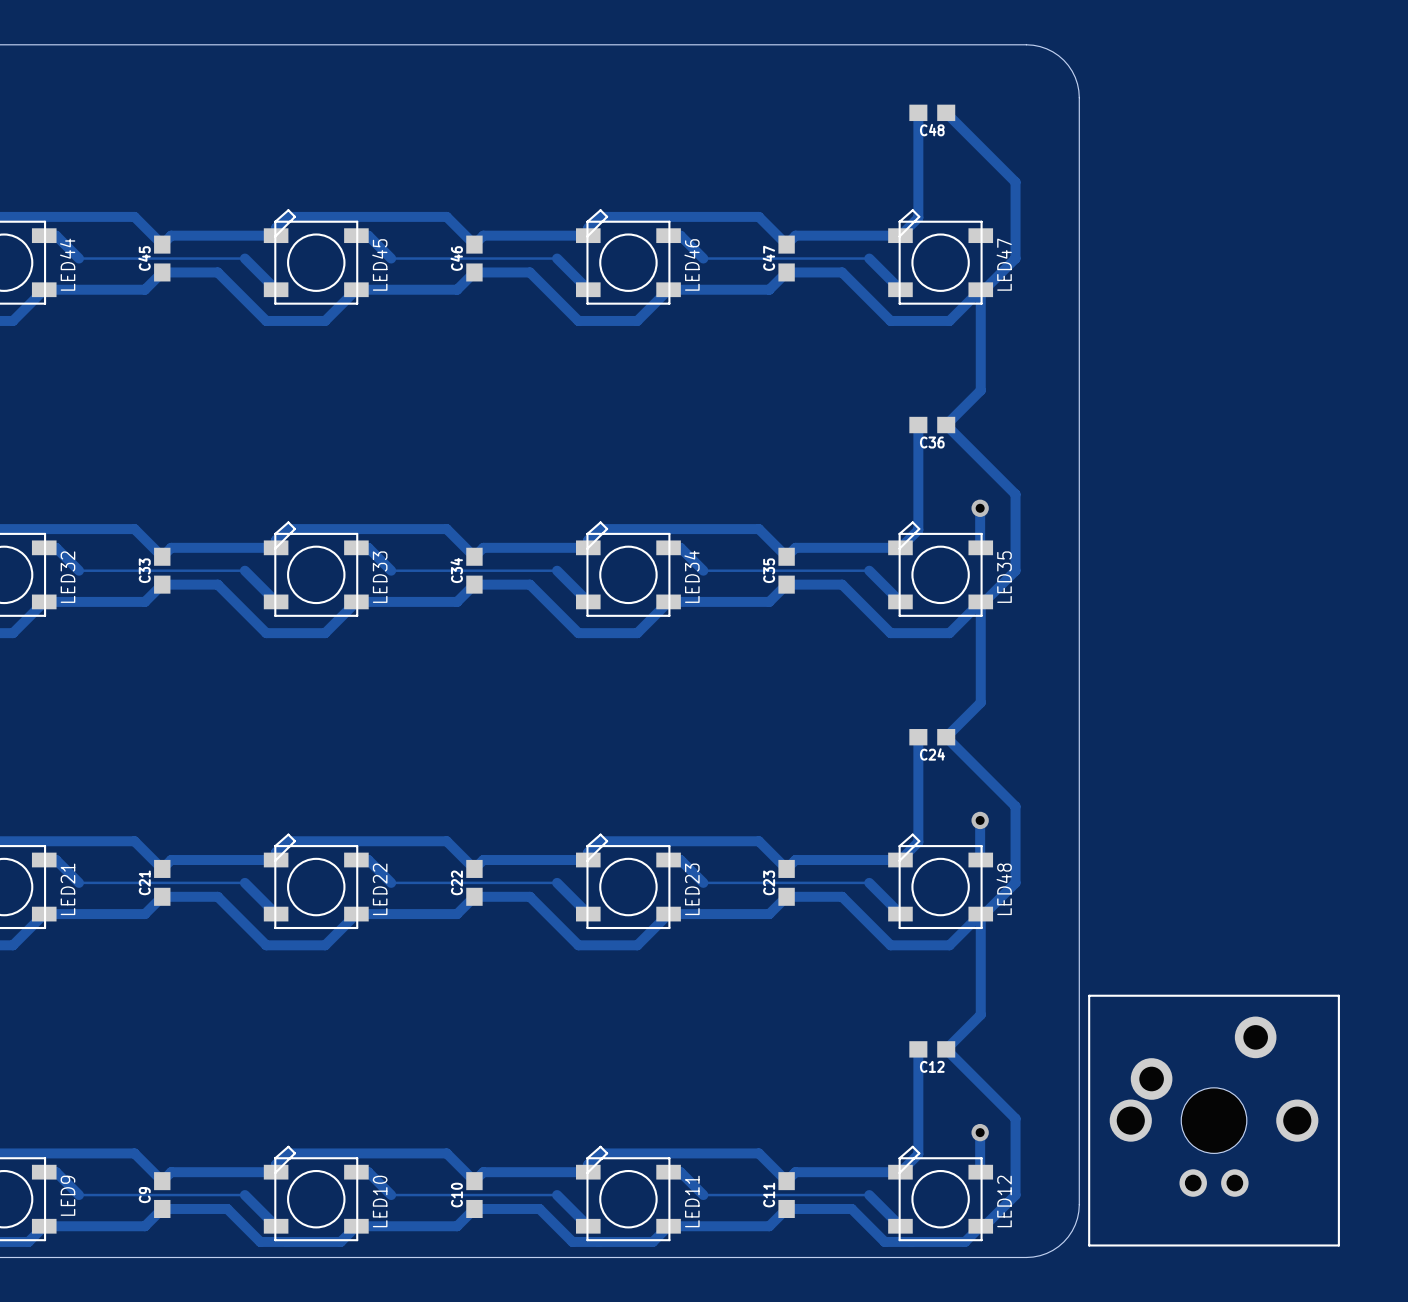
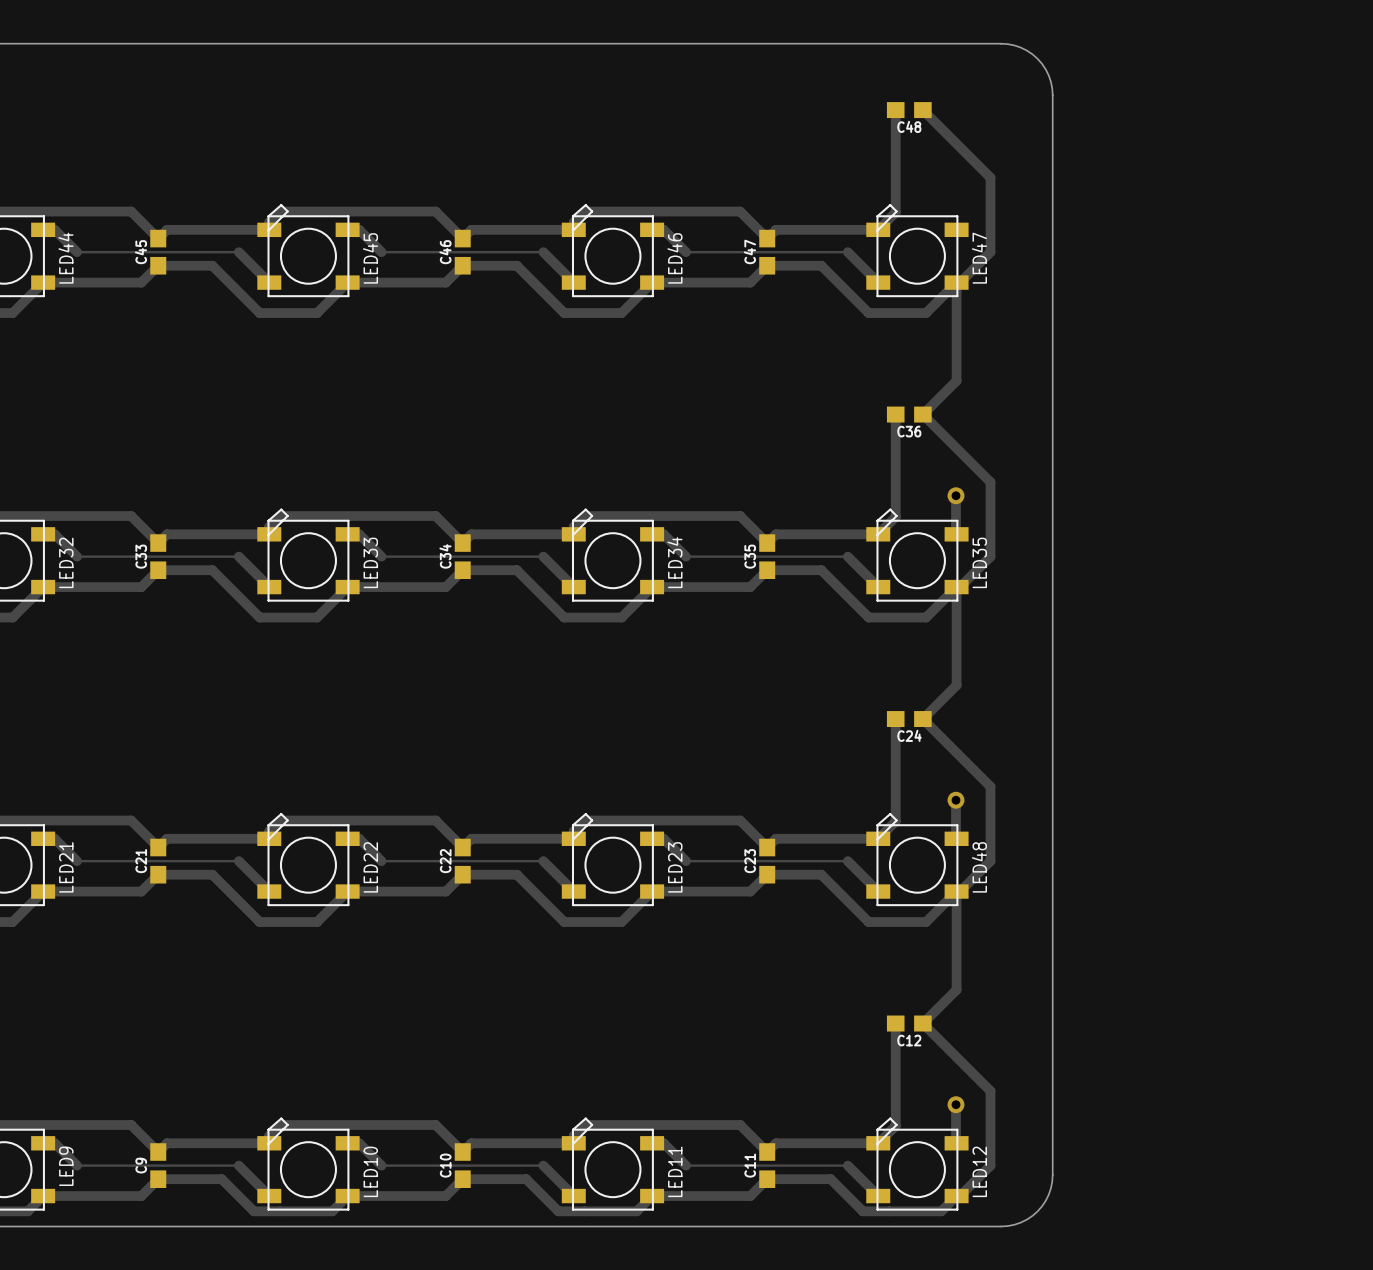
part: (1214, 1120) -> none

